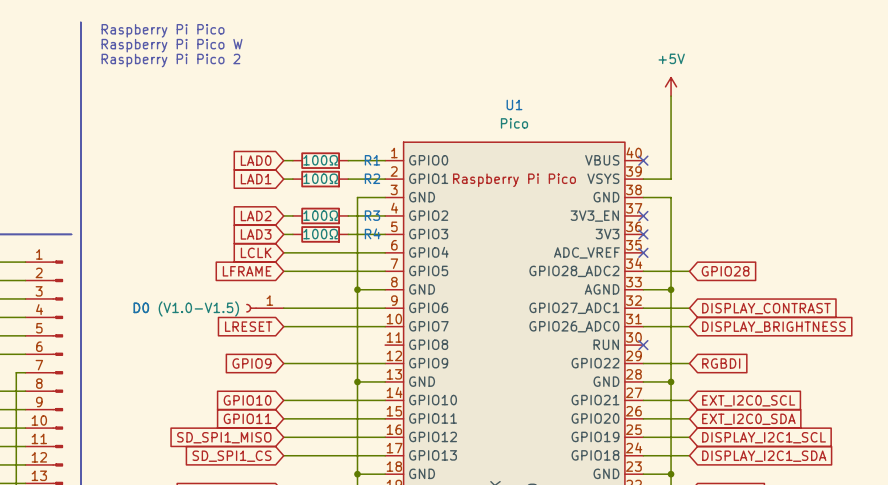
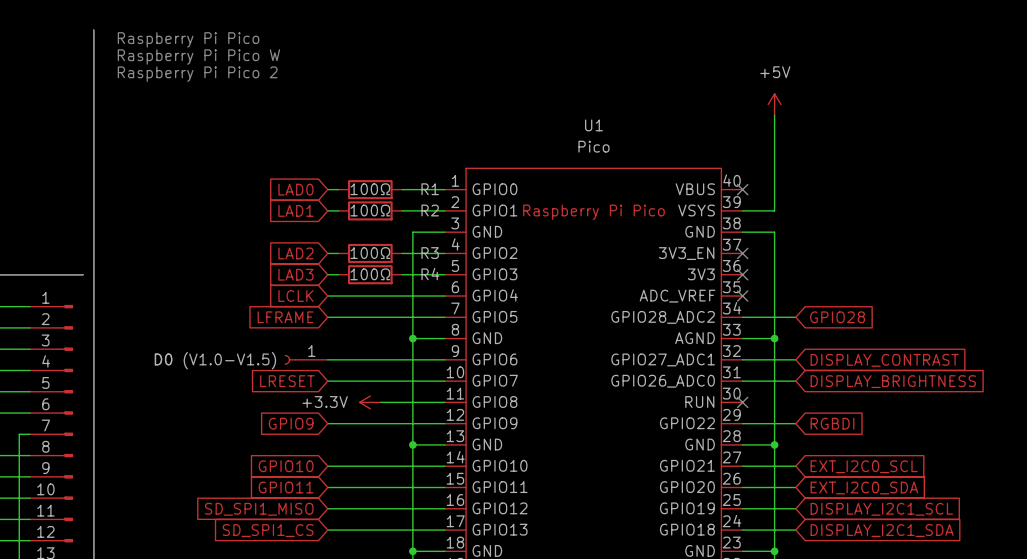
power symbol: none -> +3.3V (370, 402)
wire: none -> (380, 402) (444, 402)

